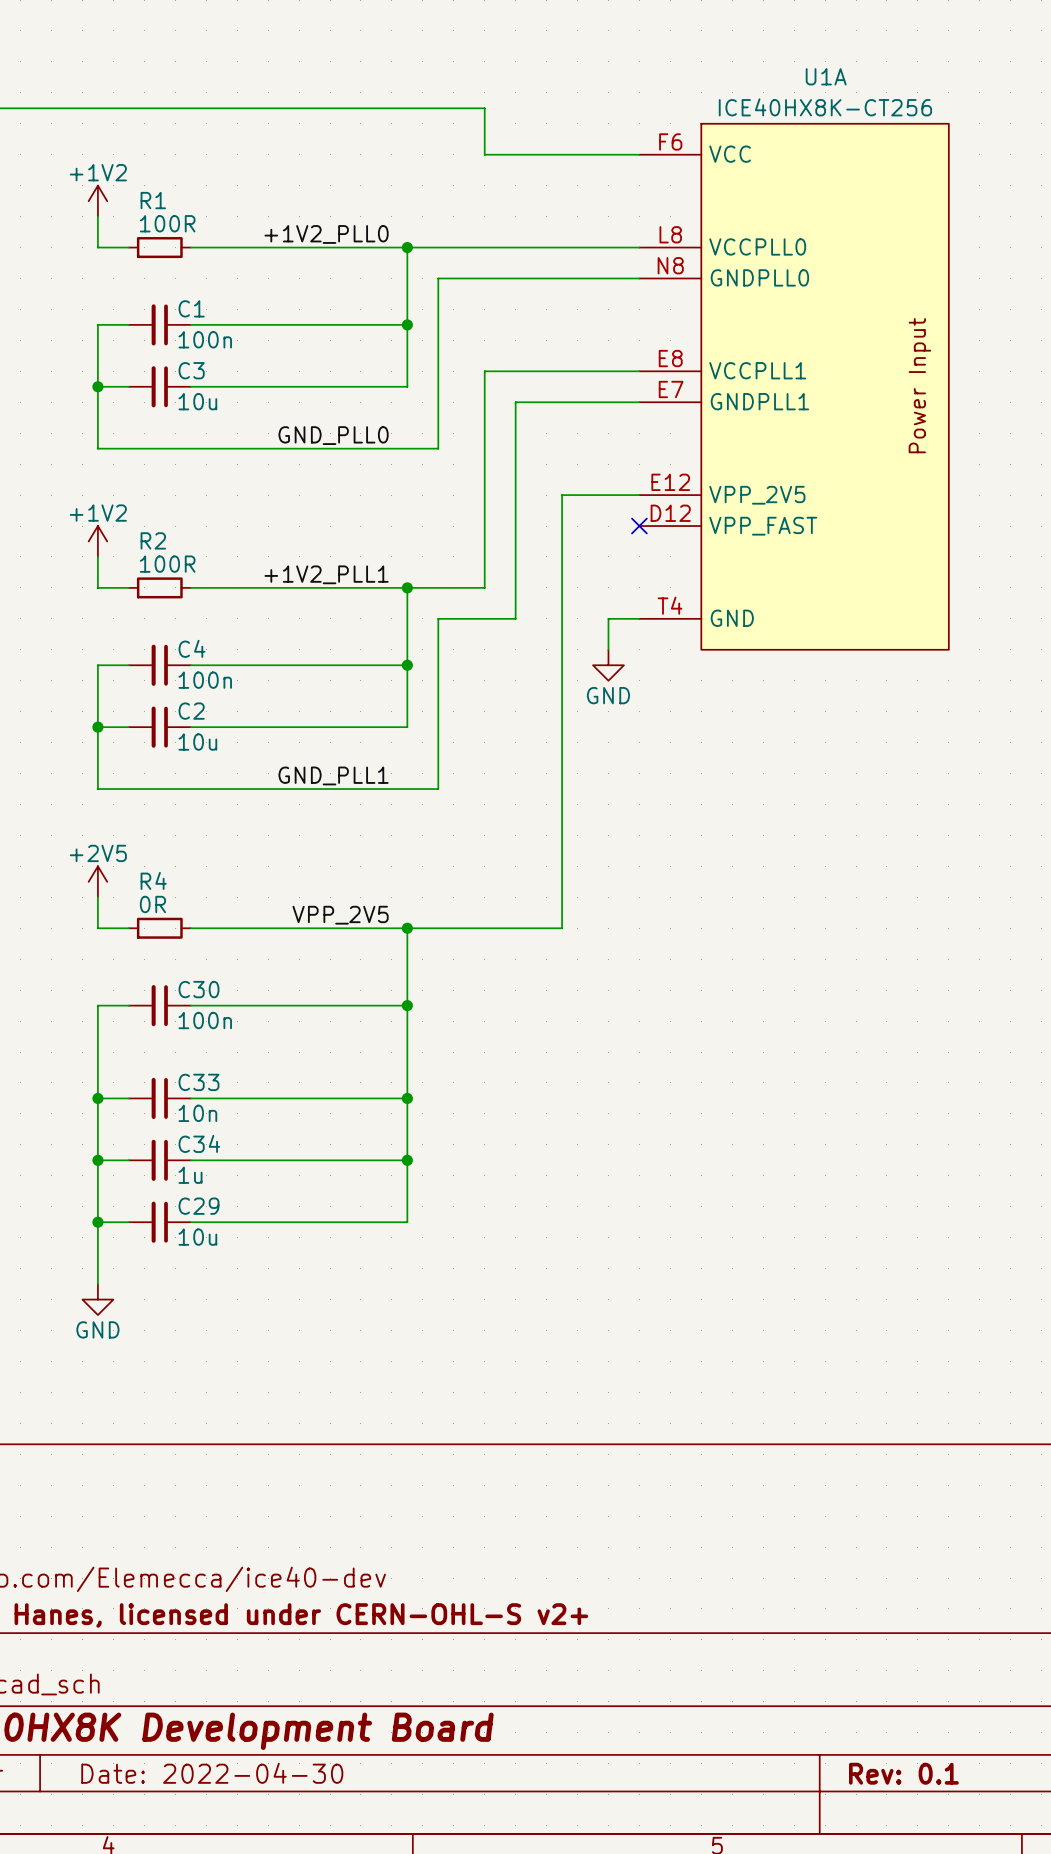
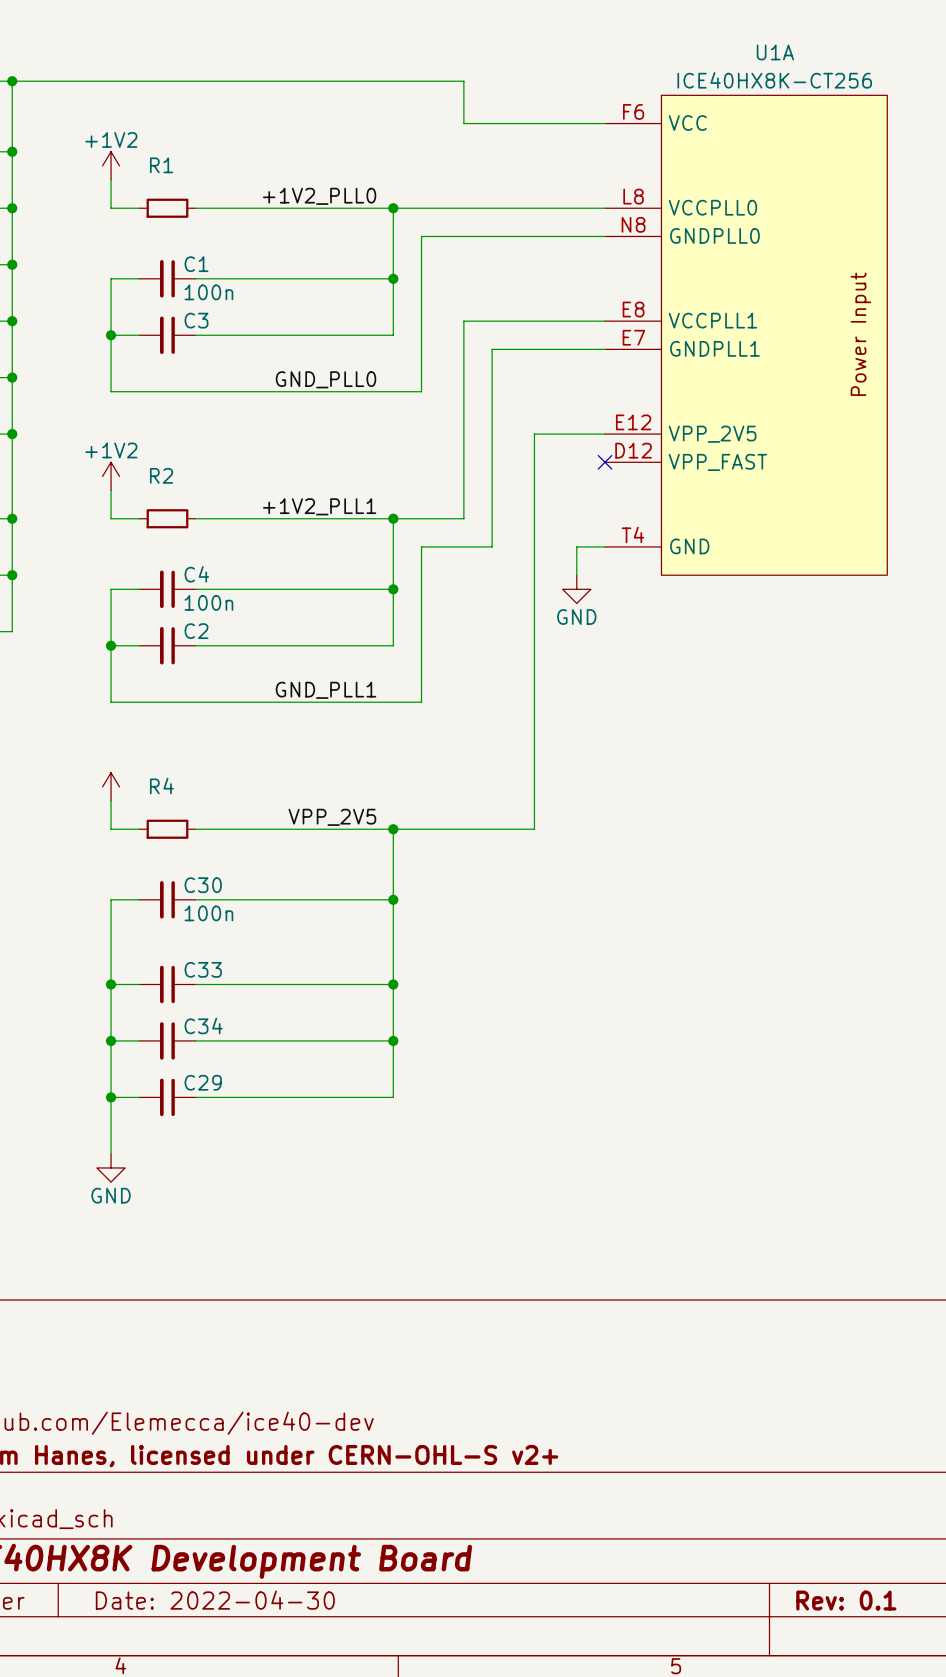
R1 value: 100R (167, 223) -> none
C3 value: 10u (197, 401) -> none
R2 value: 100R (167, 564) -> none
C2 value: 10u (197, 742) -> none
power symbol text: +2V5 (98, 853) -> none
R4 value: 0R (152, 904) -> none
C33 value: 10n (197, 1113) -> none
C34 value: 1u (190, 1175) -> none
C29 value: 10u (197, 1237) -> none

